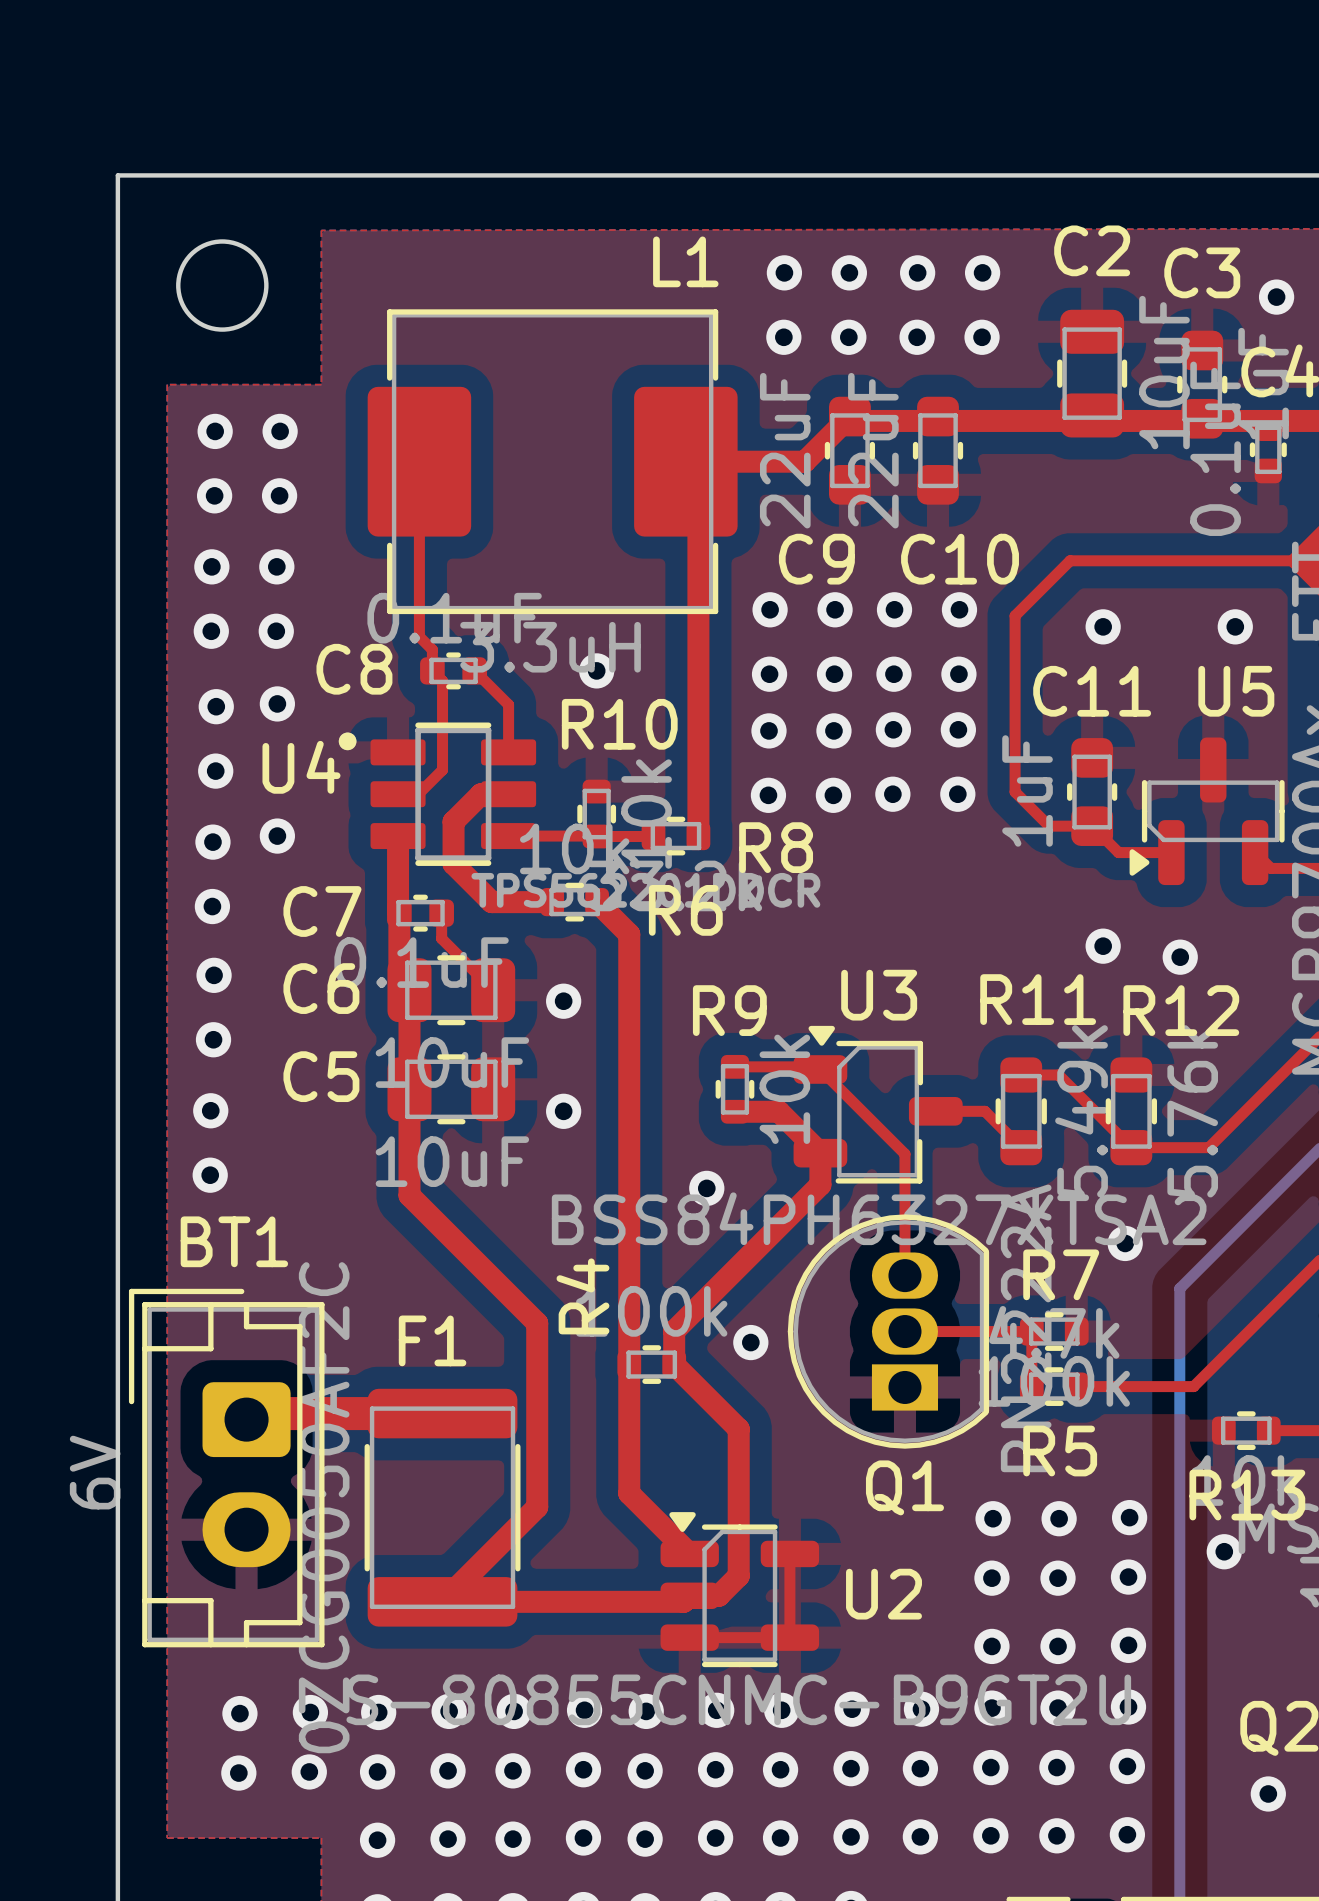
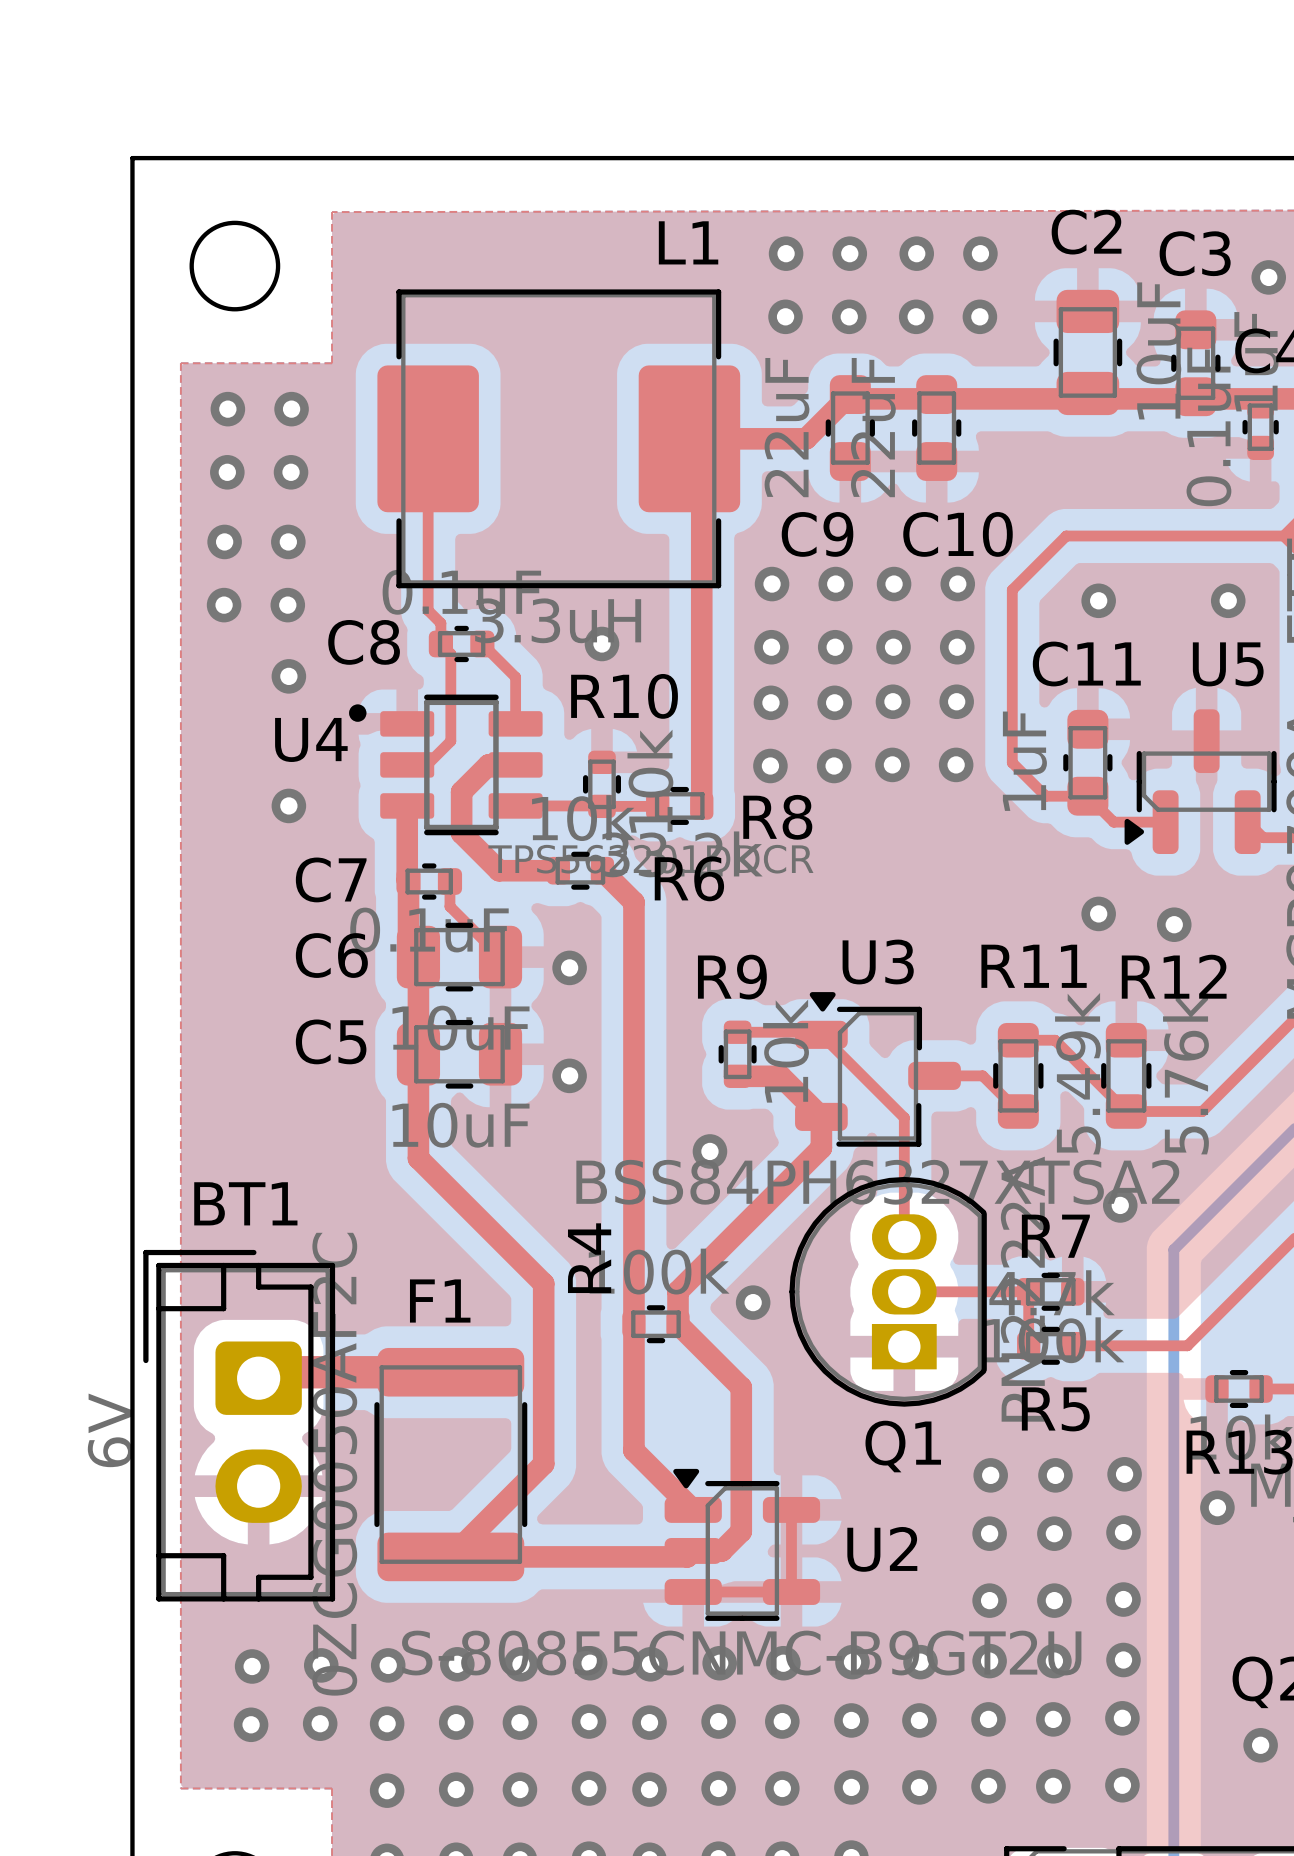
via: (216, 706) -> none
via: (215, 771) -> none
via: (212, 842) -> none
via: (212, 906) -> none
via: (214, 975) -> none
via: (213, 1039) -> none
via: (210, 1110) -> none
via: (210, 1175) -> none

